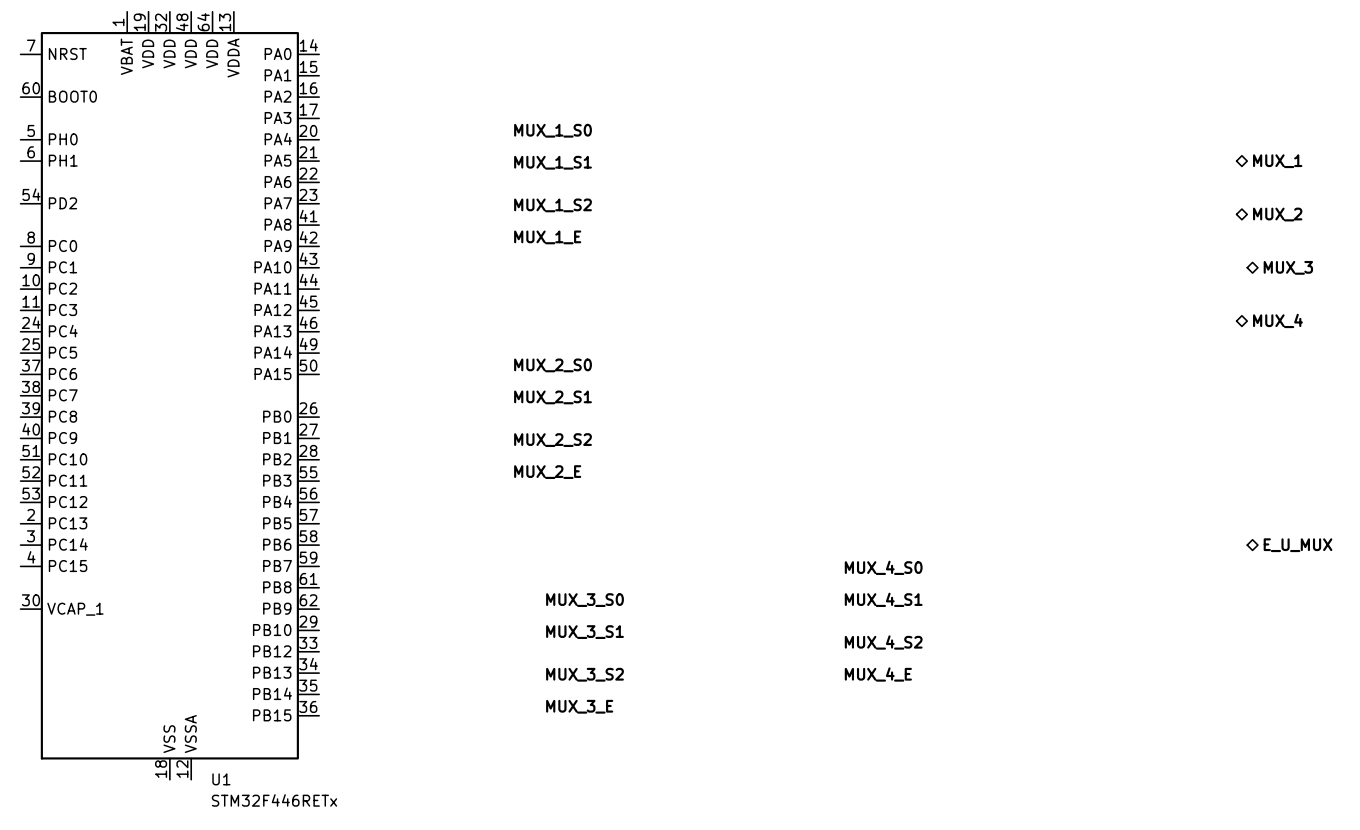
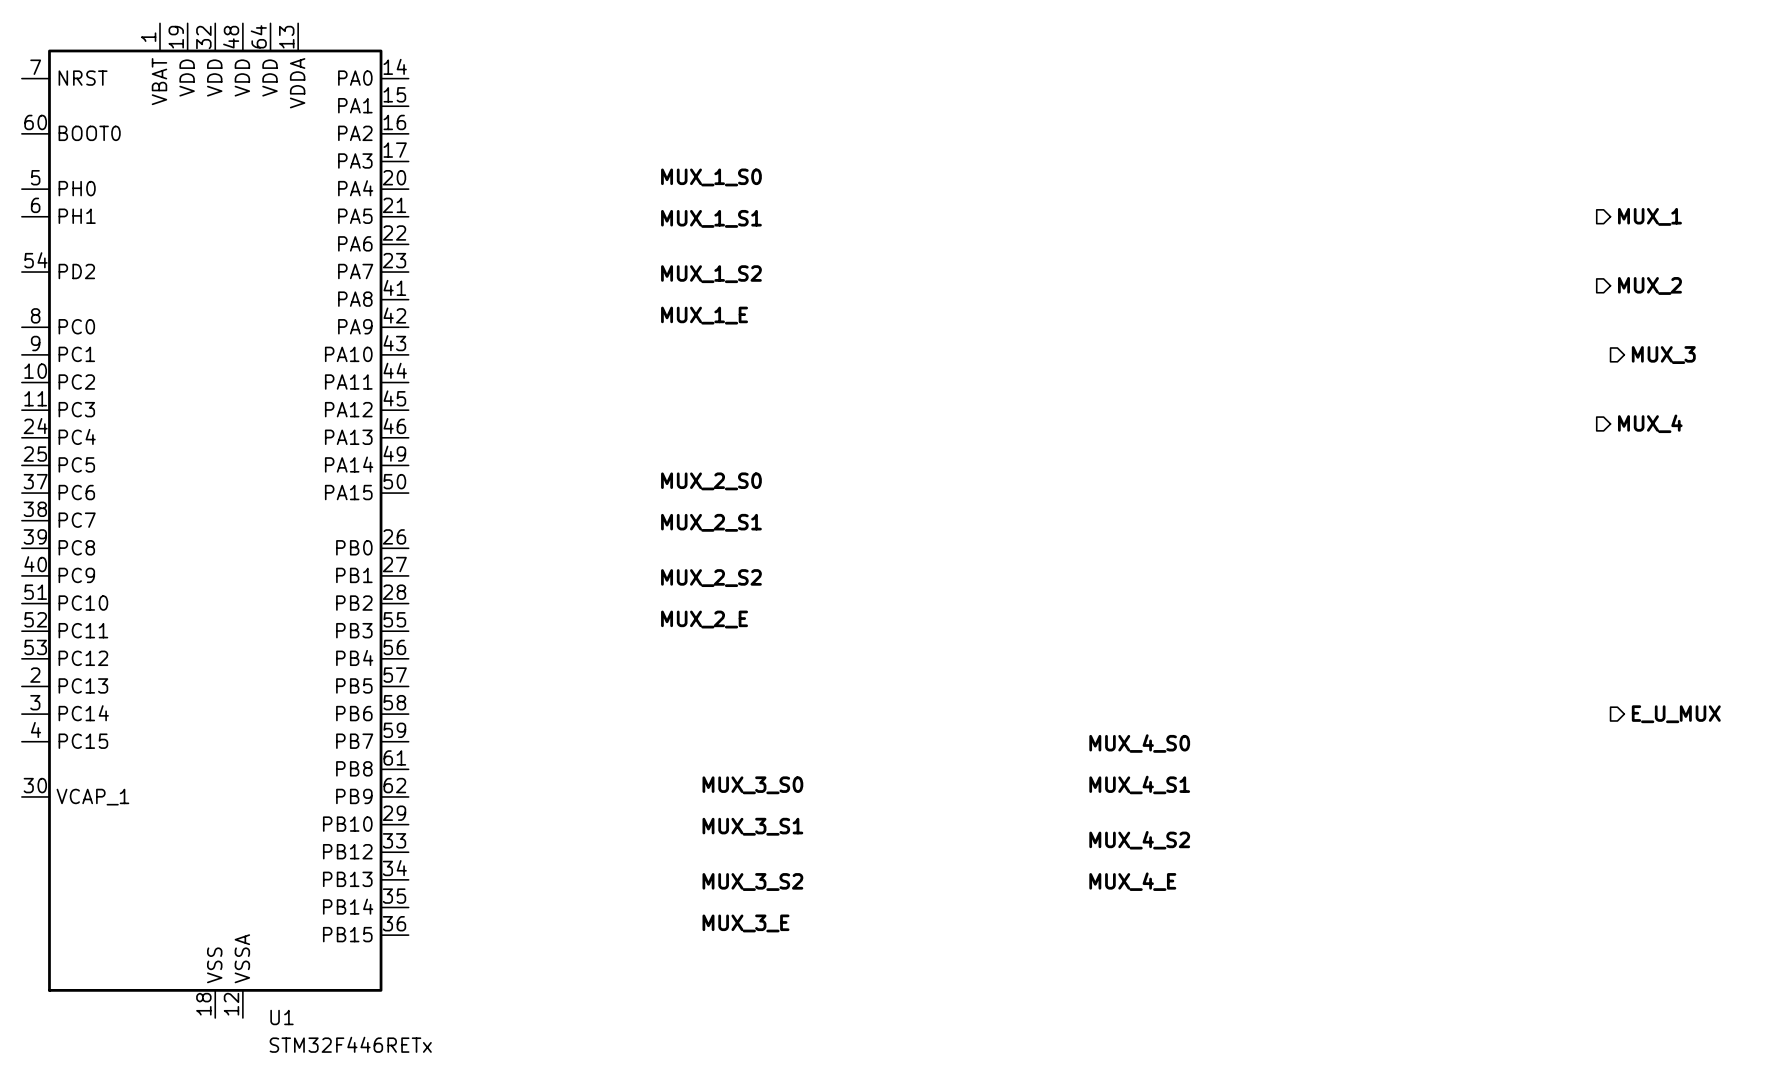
hierarchical label shape: bidirectional (1277, 161) -> output (1649, 216)
hierarchical label shape: bidirectional (1277, 214) -> output (1649, 285)
hierarchical label shape: bidirectional (1288, 267) -> output (1663, 355)
hierarchical label shape: bidirectional (1277, 320) -> output (1650, 423)
hierarchical label shape: bidirectional (1298, 545) -> output (1676, 714)

